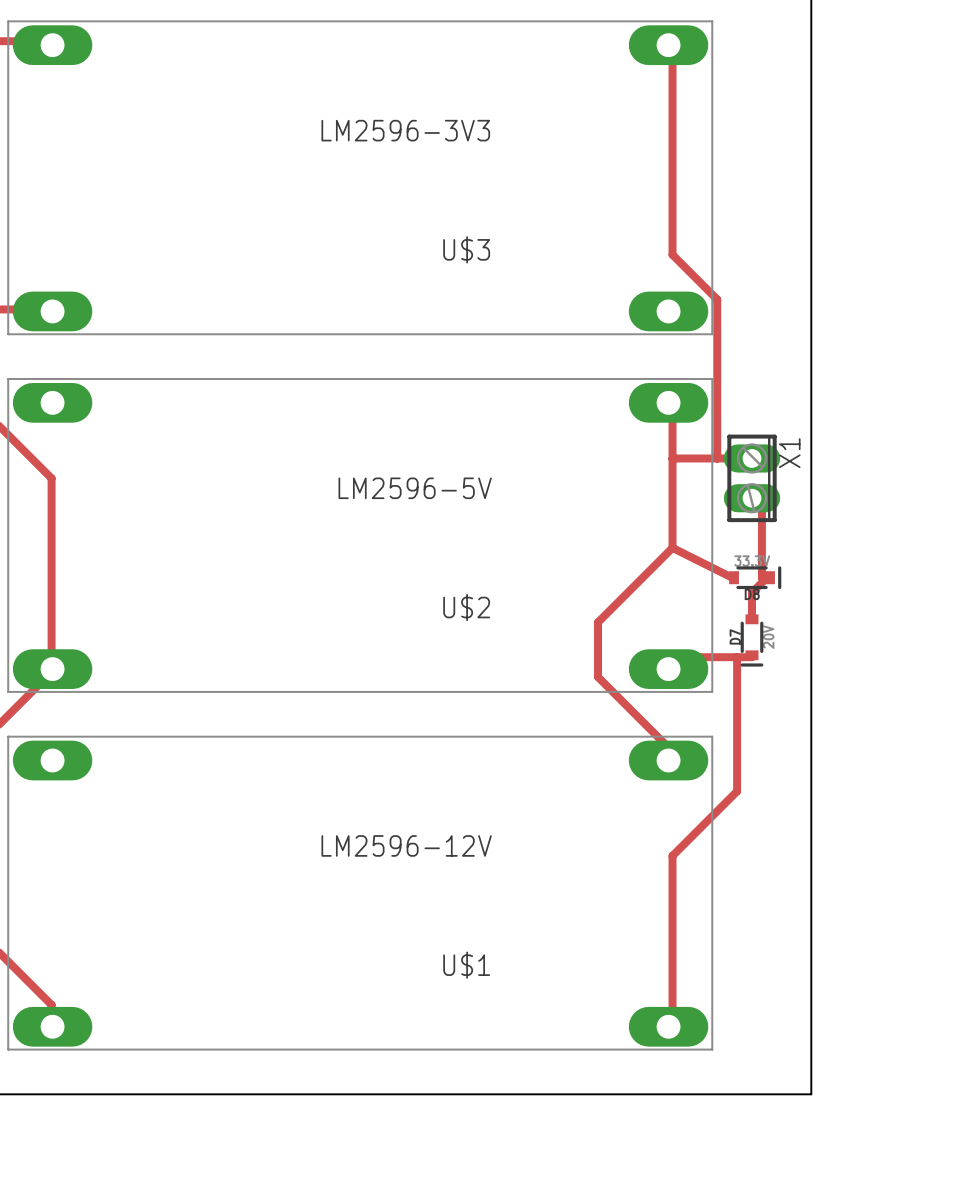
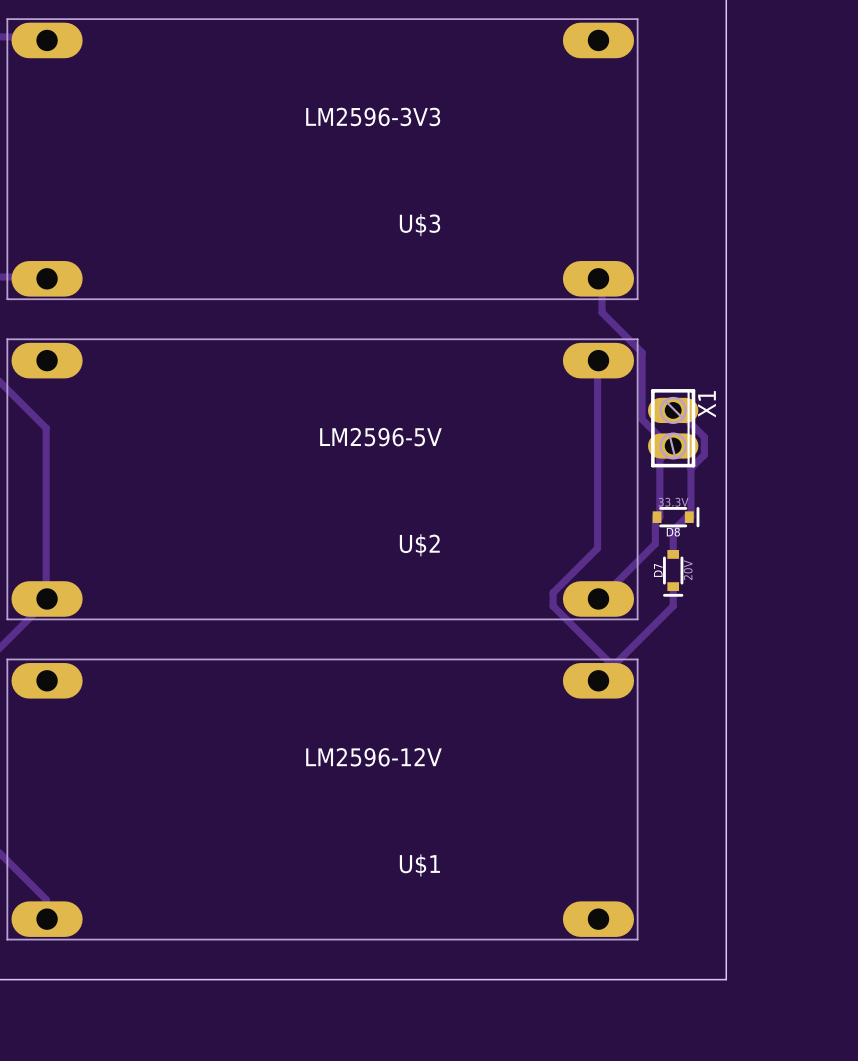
track: (668, 45) (672, 46) (672, 254) (717, 299) (717, 393) -> (598, 278) (602, 281) (602, 312) (642, 352)
track: (668, 402) (672, 403) (672, 547) -> (598, 360) (597, 548) (553, 592) (553, 606) (610, 663) (598, 680) (673, 606) (673, 588)
track: (672, 458) (752, 458) -> (689, 517) (690, 517) (690, 468) (704, 454) (704, 437) (677, 410) (673, 410)
track: none -> (642, 410) (642, 419) (668, 446) (673, 446) (659, 459) (659, 517) (657, 517)
track: (752, 498) (761, 508) (761, 577) (764, 580) -> none
track: (672, 547) (732, 577) -> none
track: (672, 547) (598, 622) (598, 677) (667, 746) (668, 760) -> none
track: (682, 657) (752, 657) -> (610, 588) (655, 543) (655, 517)
track: (737, 657) (737, 791) (672, 855) (672, 1024) (668, 1026) -> none

